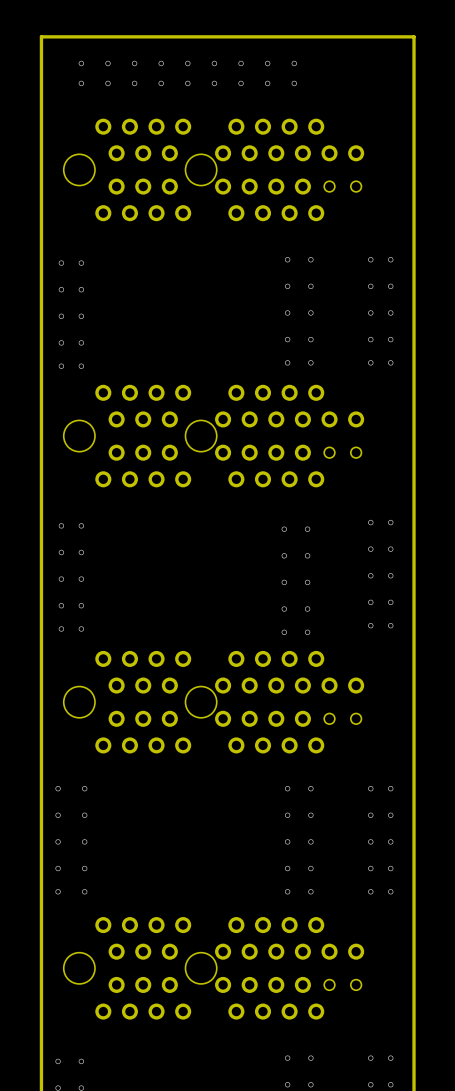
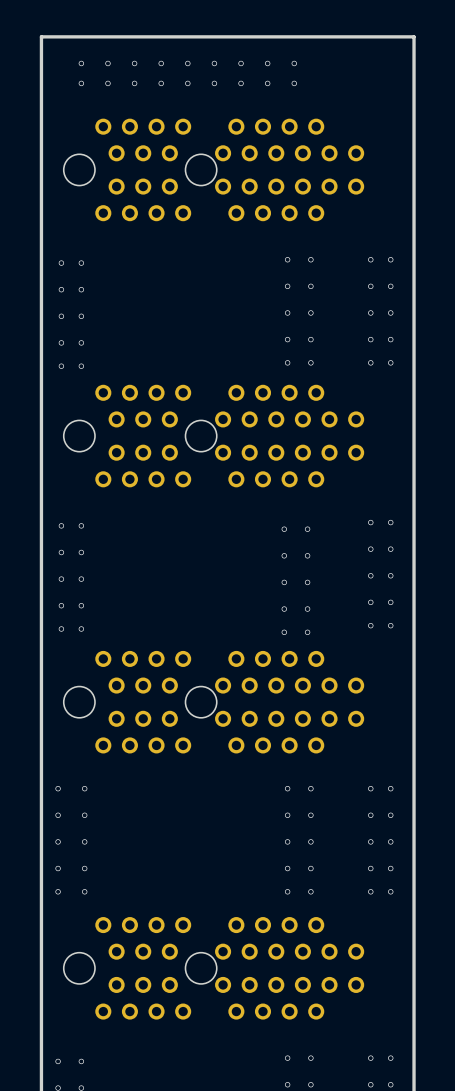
part footprint: [63, 118, 365, 222] -> [63, 118, 365, 222]
part footprint: [63, 384, 365, 488] -> [63, 384, 365, 488]
part footprint: [63, 650, 365, 754] -> [63, 650, 365, 754]
part footprint: [63, 917, 365, 1020] -> [63, 917, 365, 1020]

